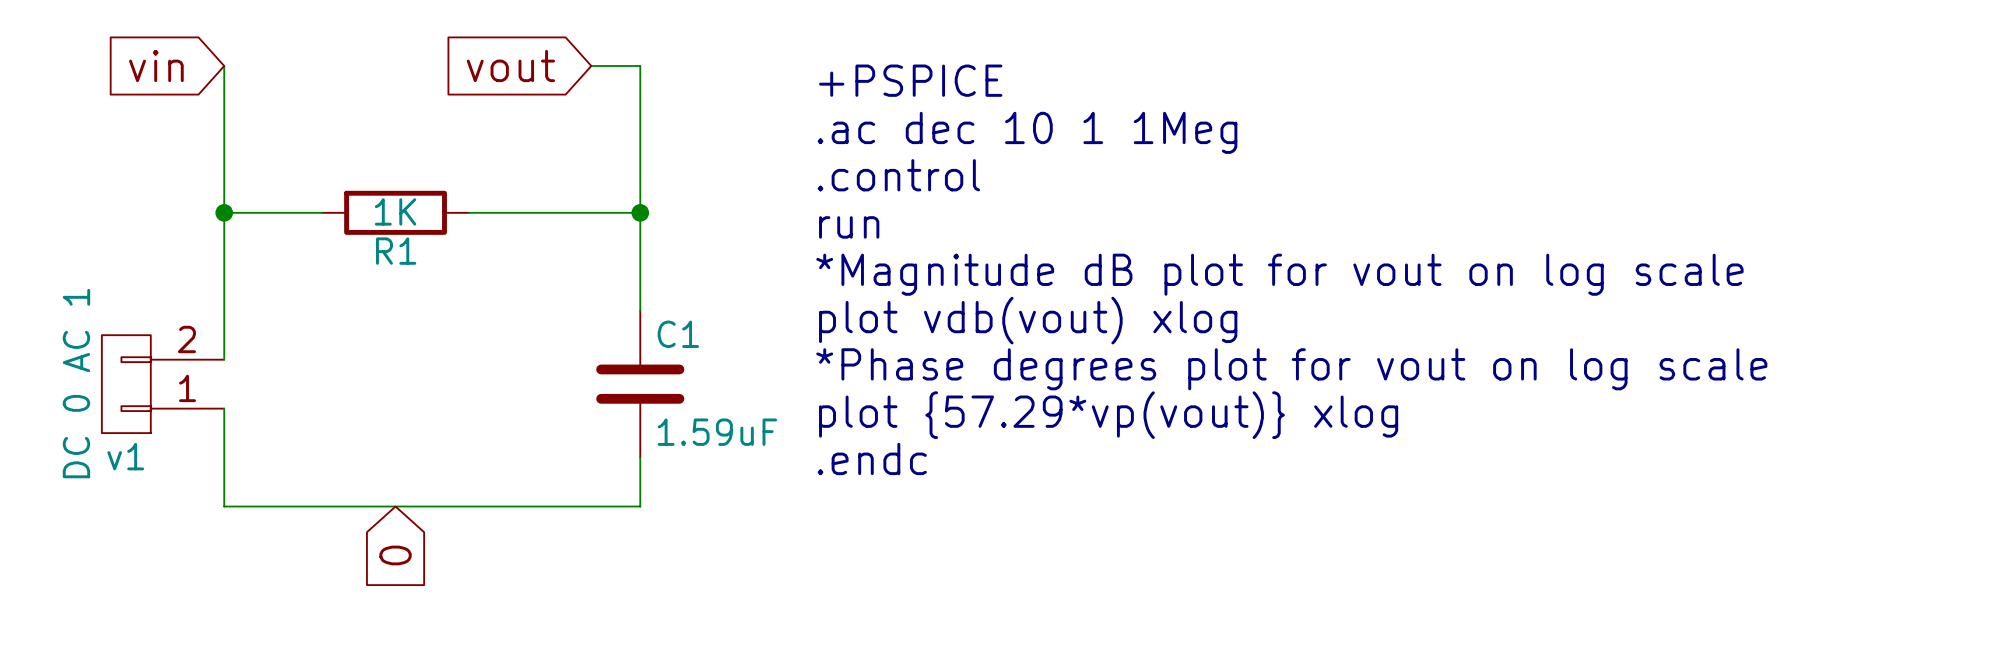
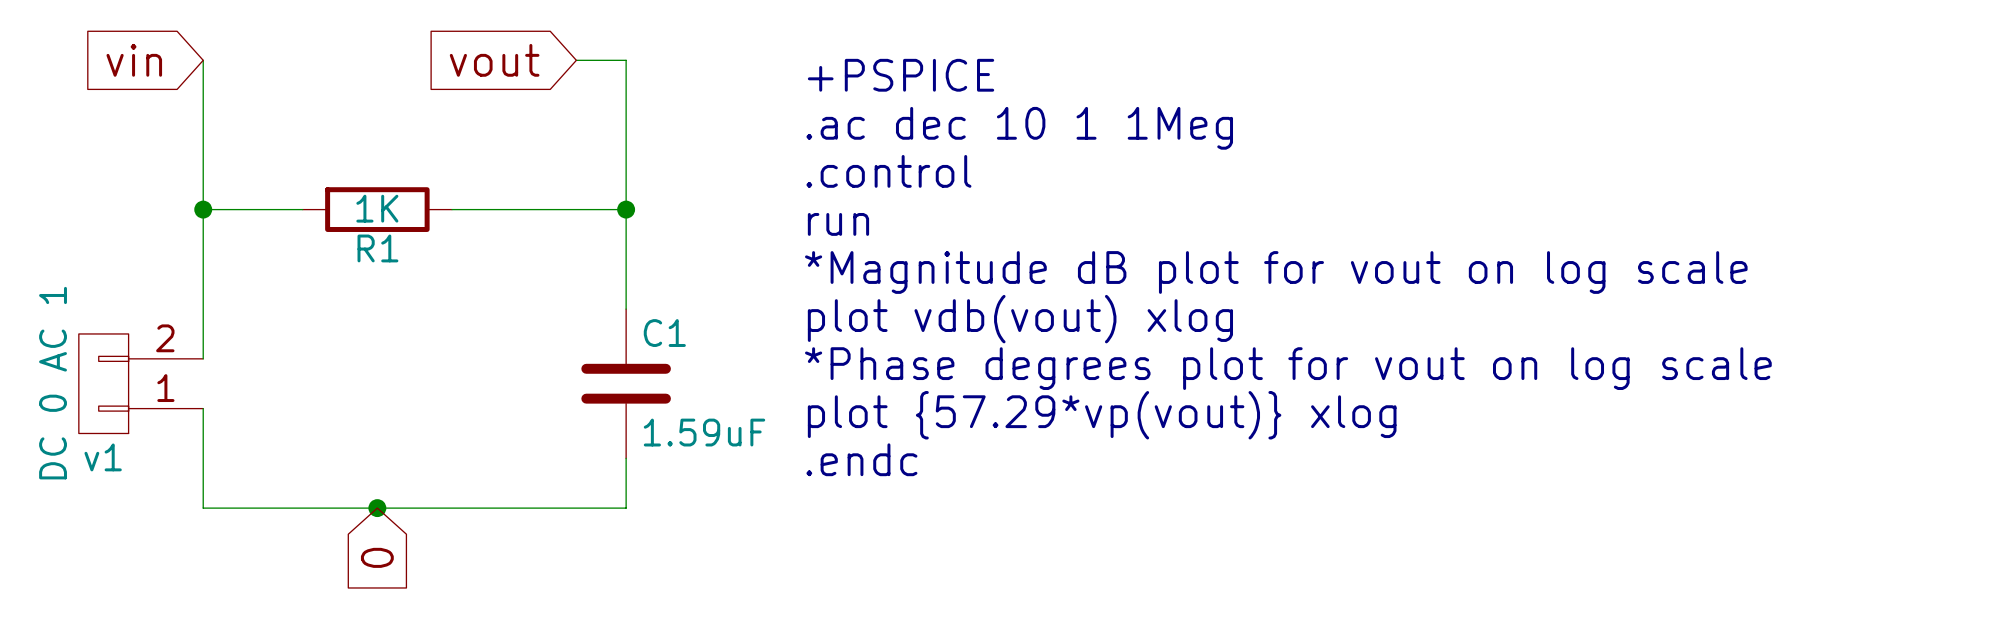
junction: none -> (377, 508)

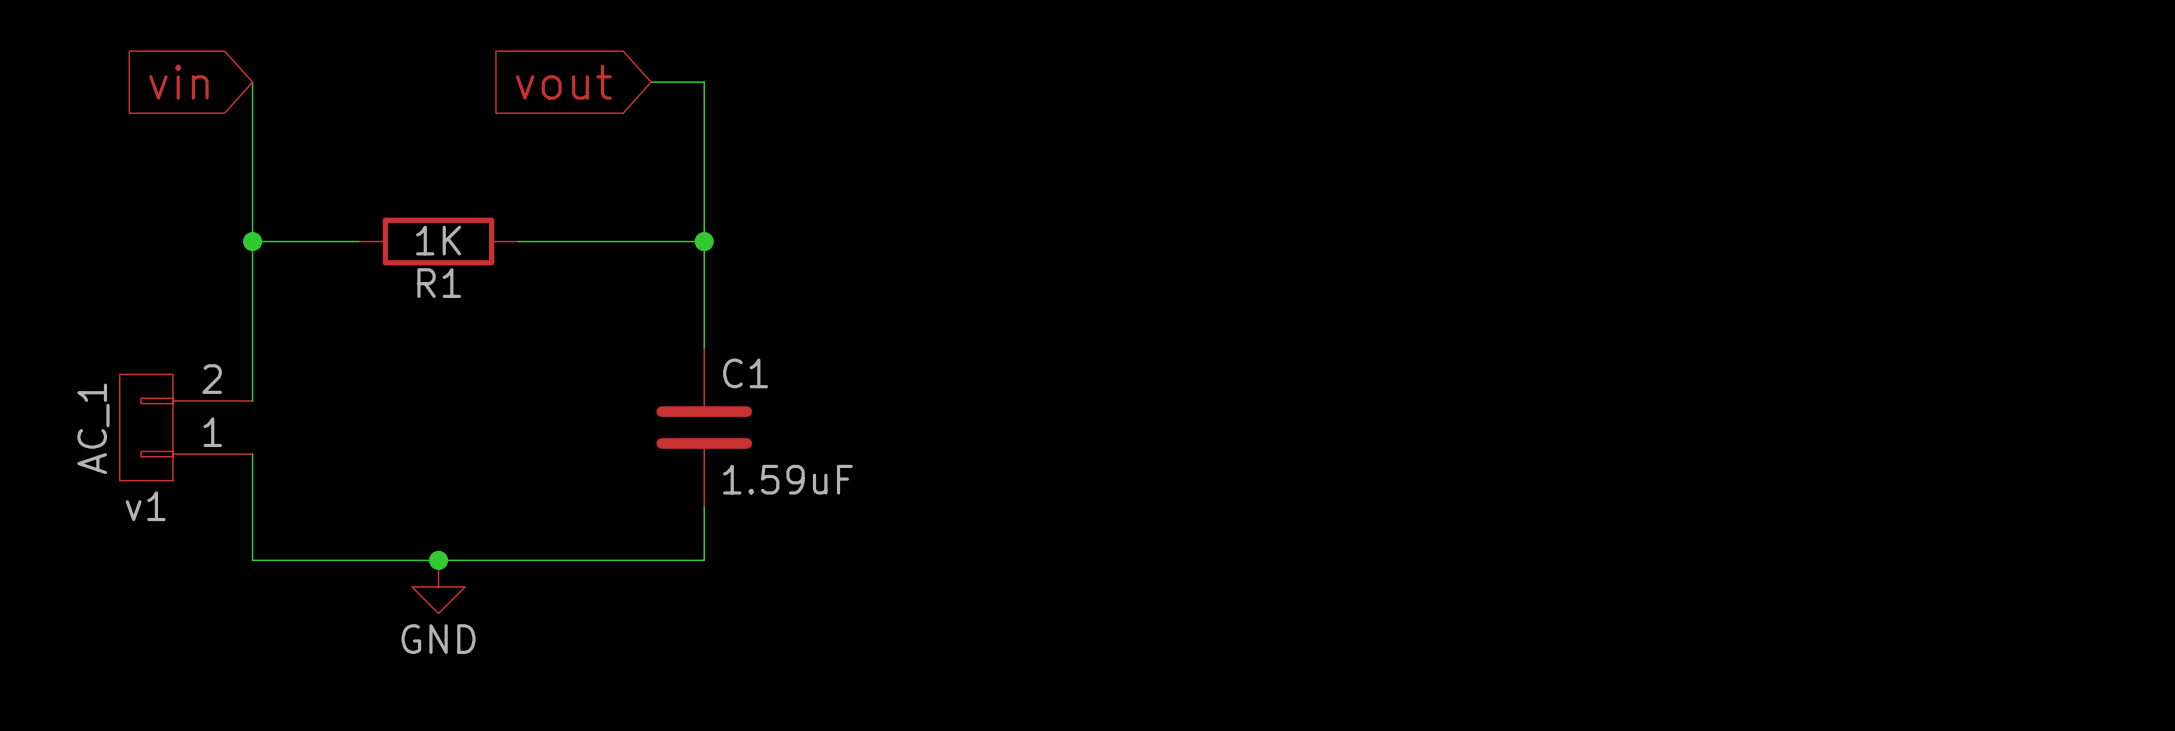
text: +PSPICE (901, 75) -> none
text: .ac dec 10 1 1Meg (1019, 128) -> none
text: .control (888, 171) -> none
text: run (838, 224) -> none
text: *Magnitude dB plot for vout on log scale (1276, 272) -> none
text: plot vdb(vout) xlog (1020, 319) -> none
text: *Phase degrees plot for vout on log scale (1288, 368) -> none
v1 value: DC 0 AC 1 (53, 383) -> AC_1 (93, 428)
text: plot {57.29*vp(vout)} xlog (1102, 415) -> none
text: .endc (861, 459) -> none
power symbol: none -> GND (438, 586)
global label: 0 (377, 557) -> none

